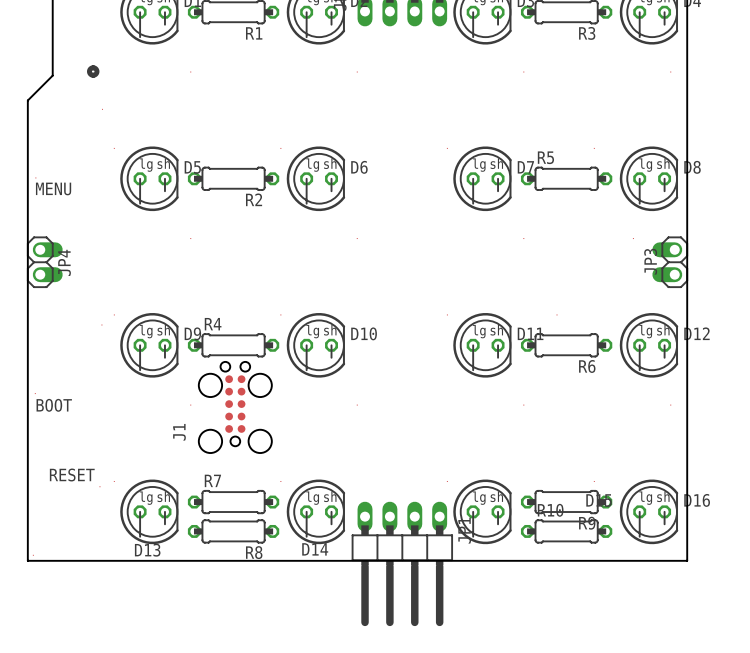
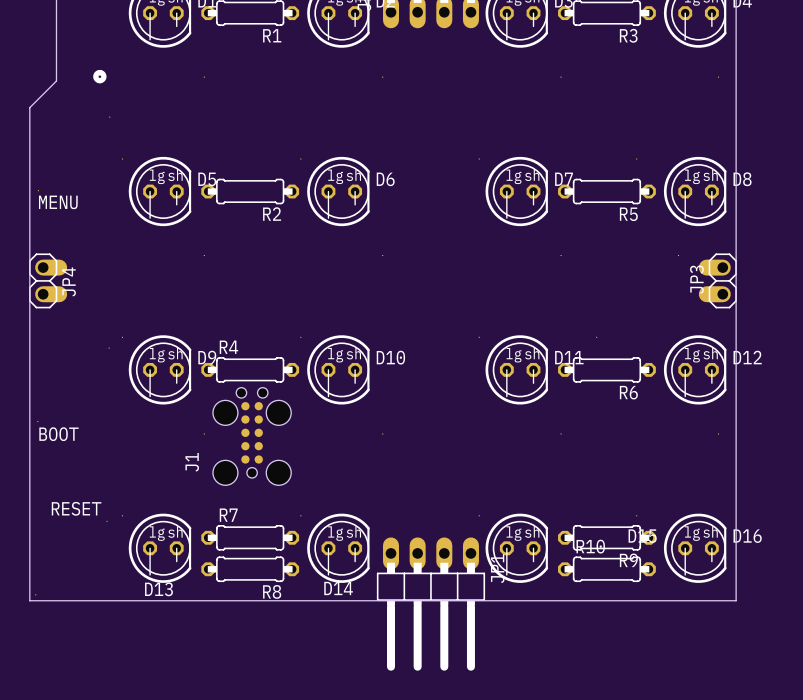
R5 name position: R5 (545, 157) -> R5 (628, 214)

